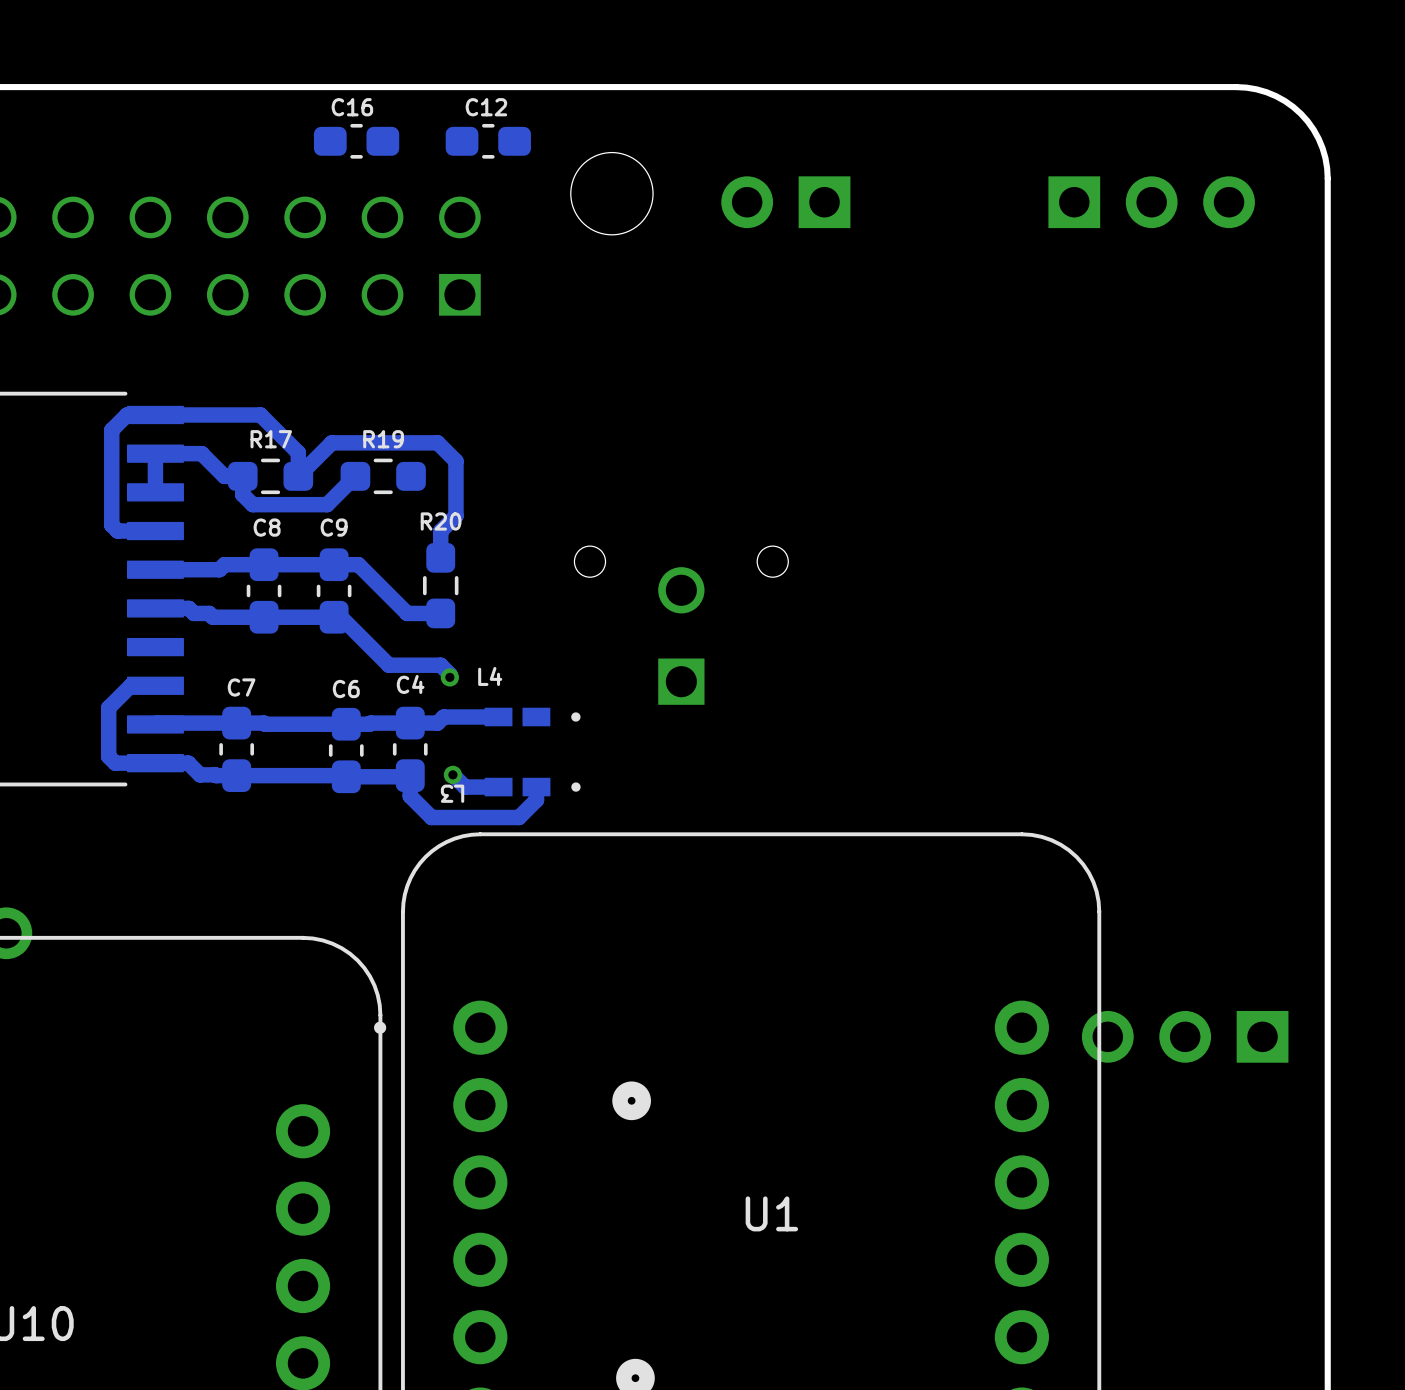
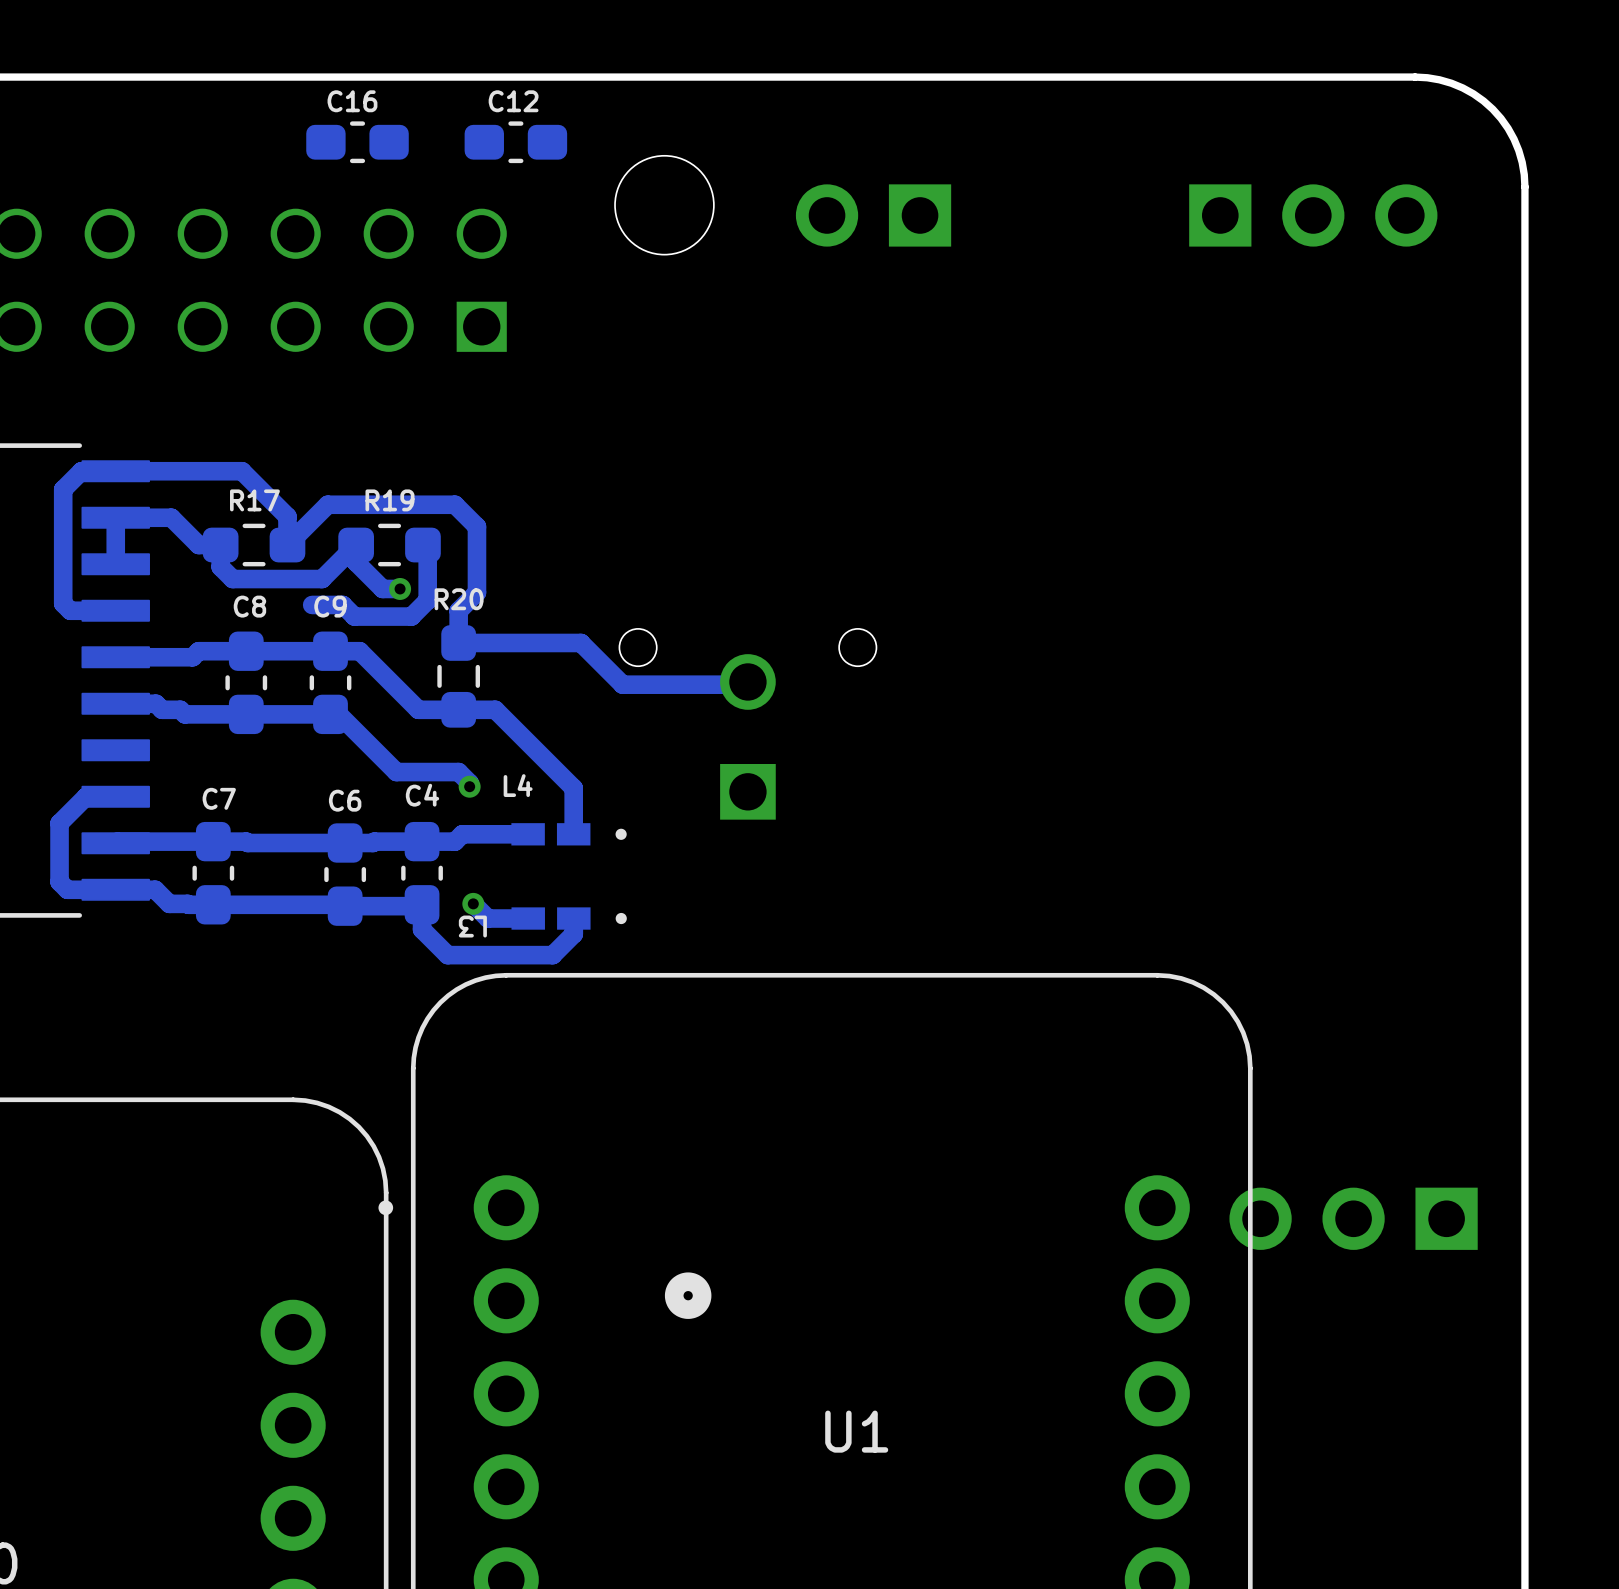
track: none -> (356, 545) (356, 562) (382, 588) (400, 588)
track: none -> (422, 545) (427, 549) (427, 600) (411, 616) (354, 616) (342, 604) (312, 604)
via: none -> (400, 588)
track: none -> (458, 642) (581, 642) (622, 684) (745, 684) (747, 681)
track: none -> (458, 709) (495, 709) (573, 788) (573, 834)

